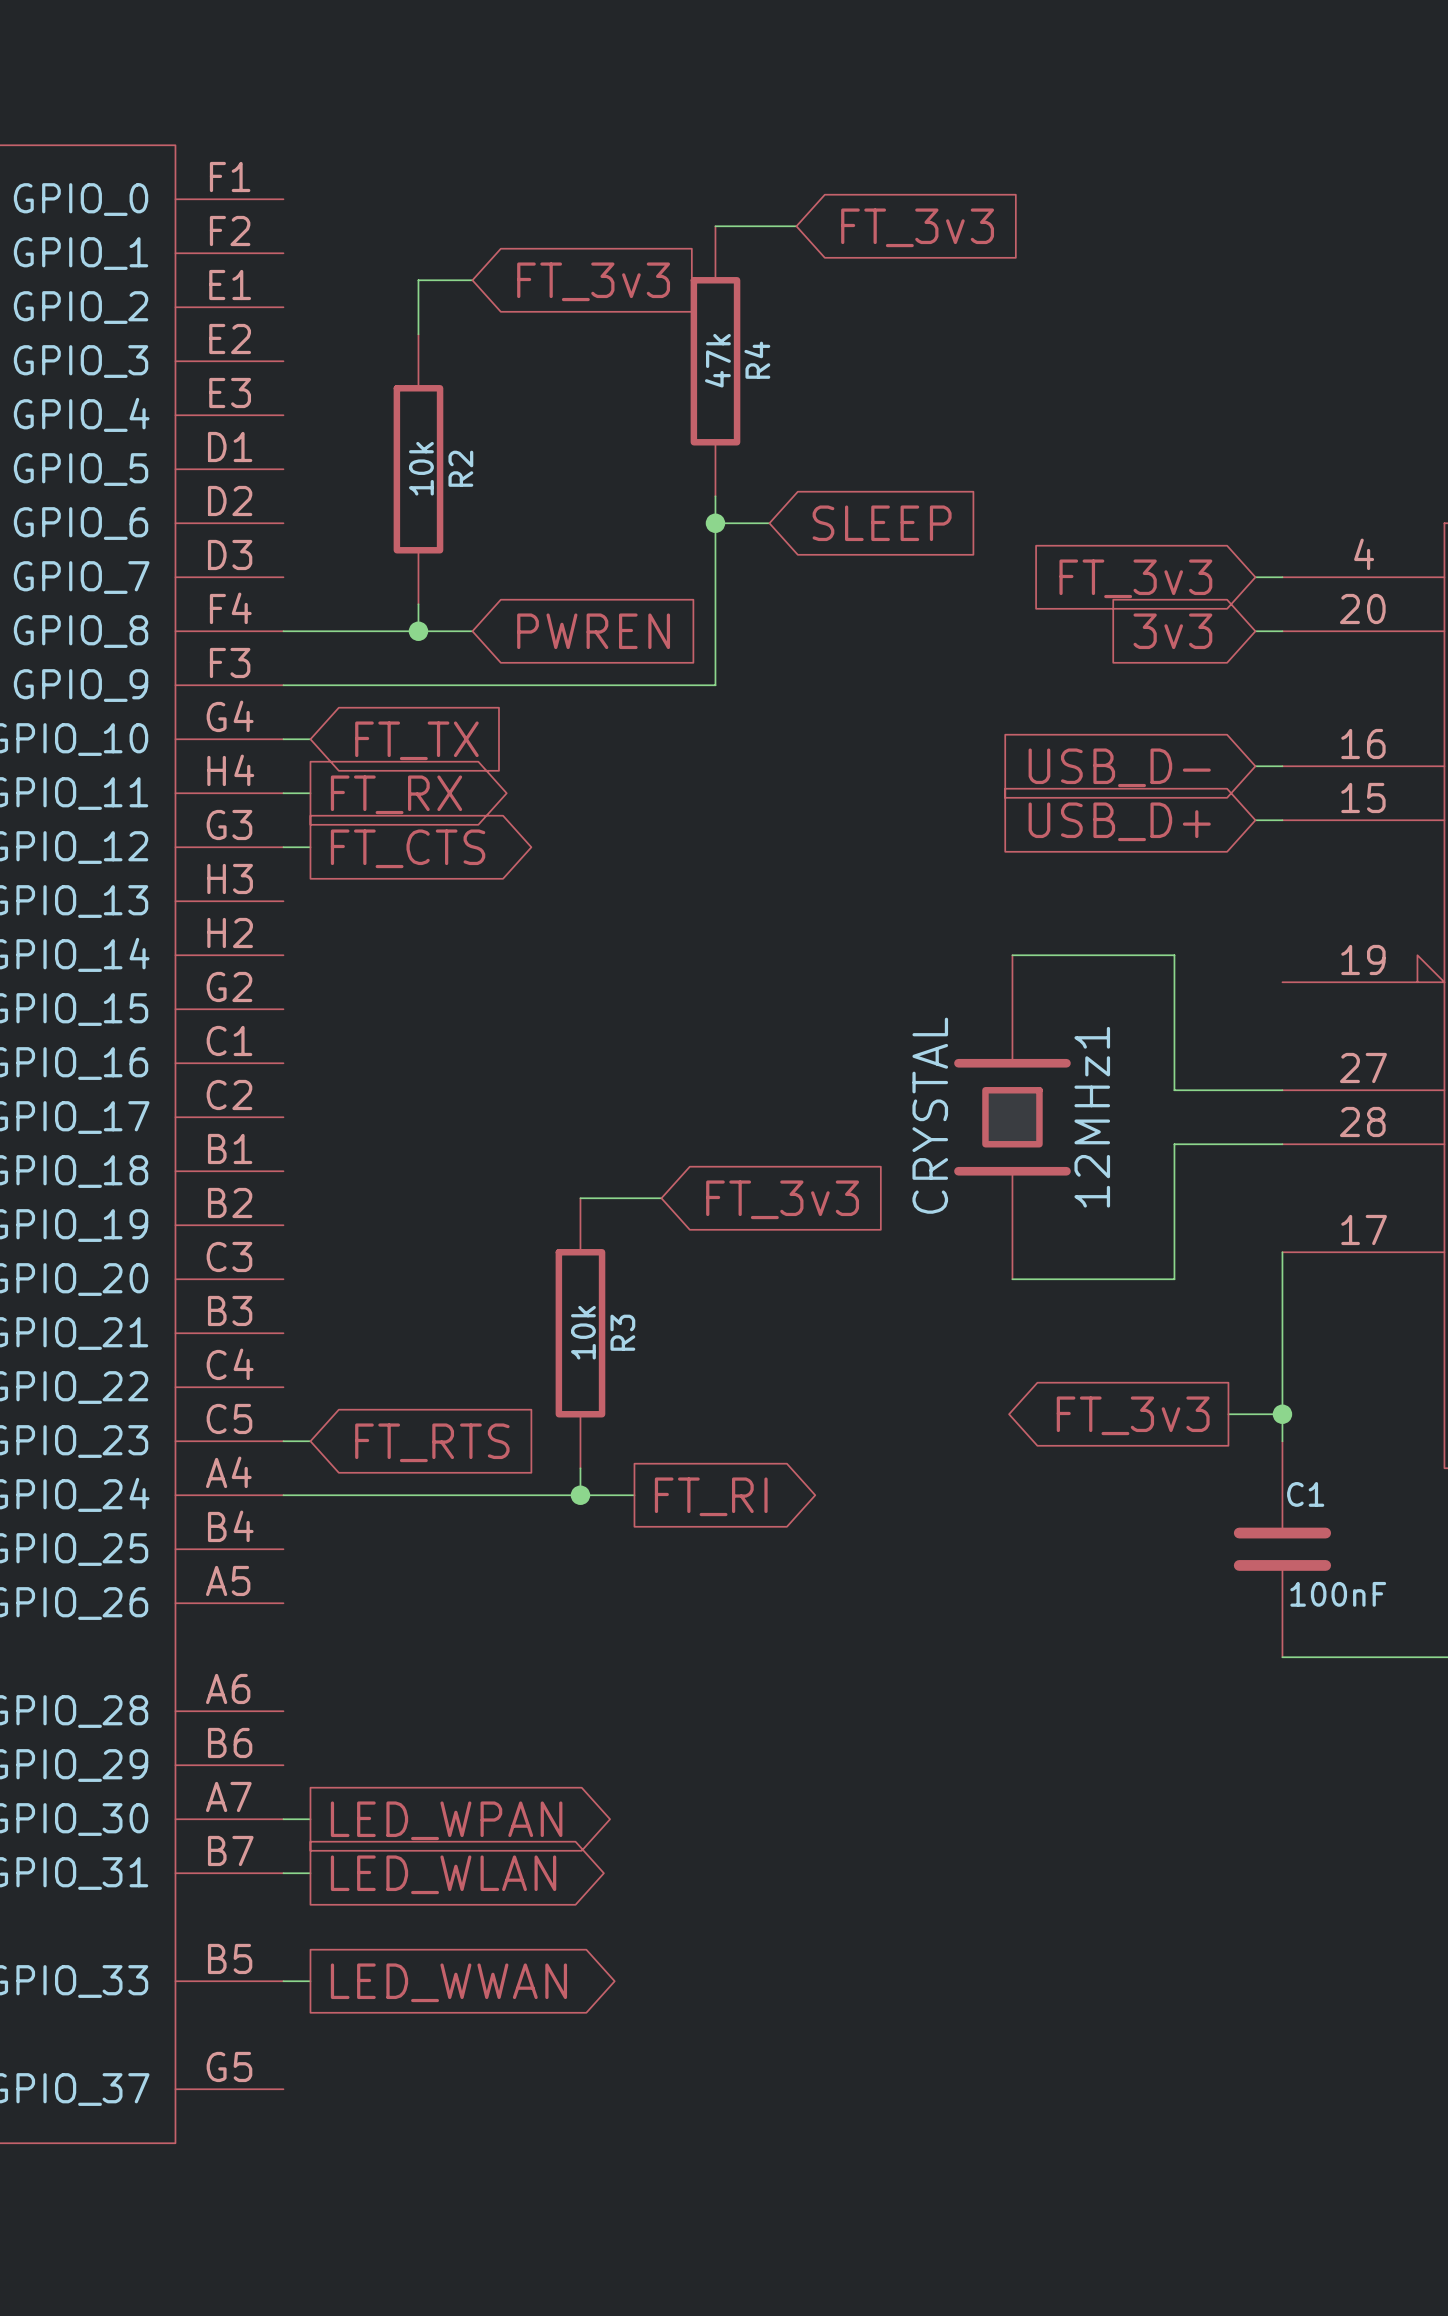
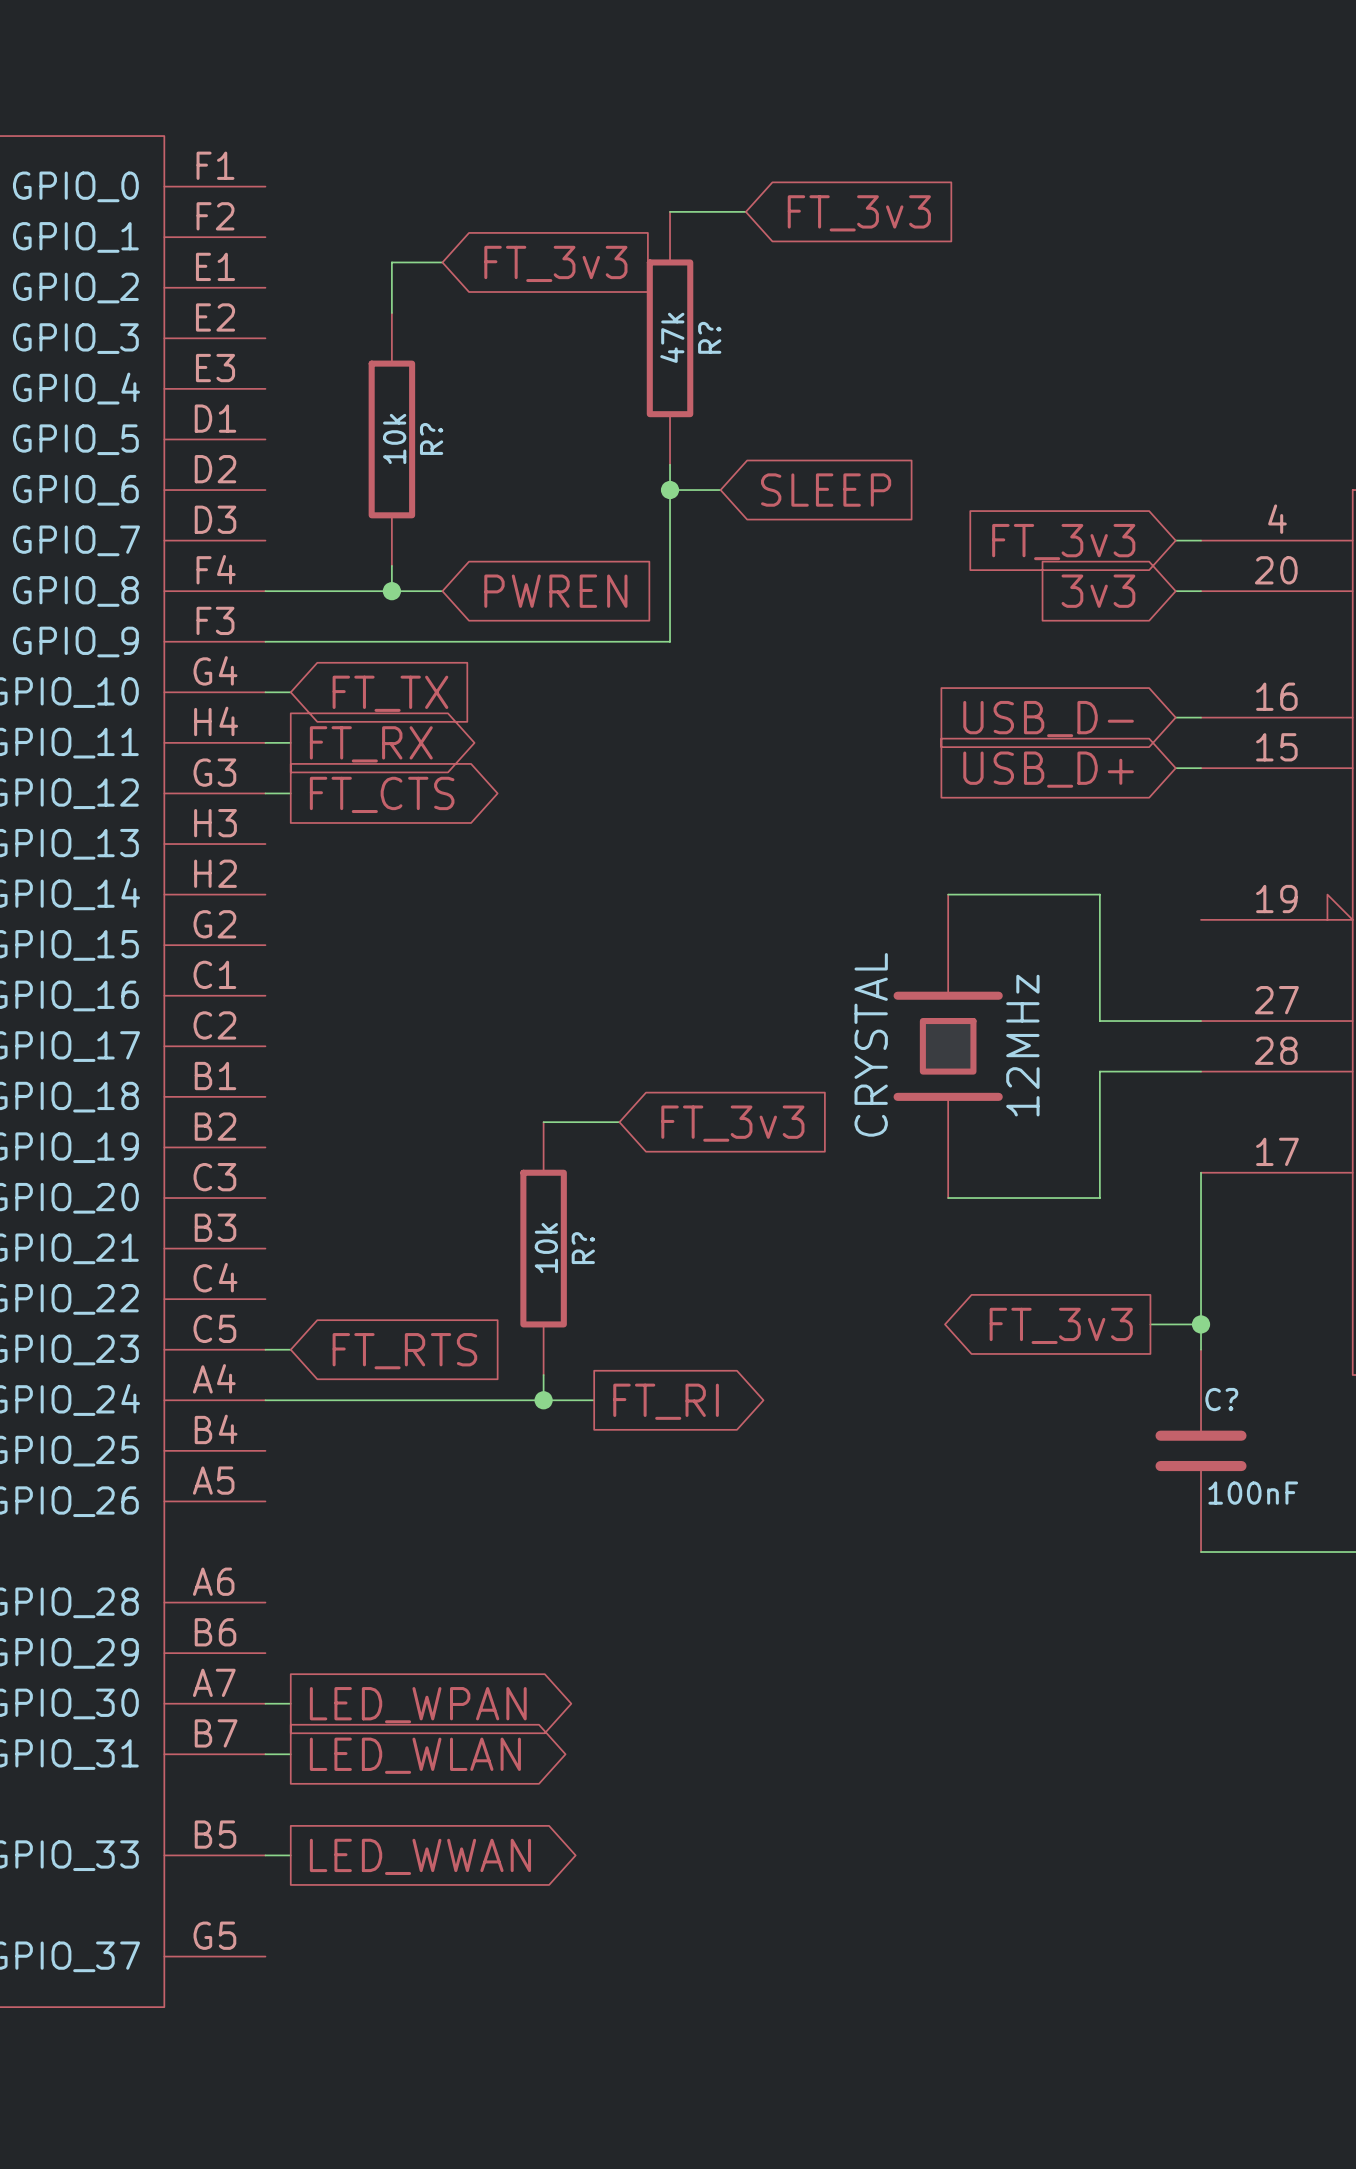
R4 name: R4 (757, 360) -> R? (709, 337)
R2 name: R2 (460, 468) -> R? (431, 438)
12MHz1 name: 12MHz1 (1092, 1117) -> 12MHz (1022, 1045)
R3 name: R3 (622, 1332) -> R? (583, 1248)
C1 name: C1 (1305, 1494) -> C? (1221, 1399)

